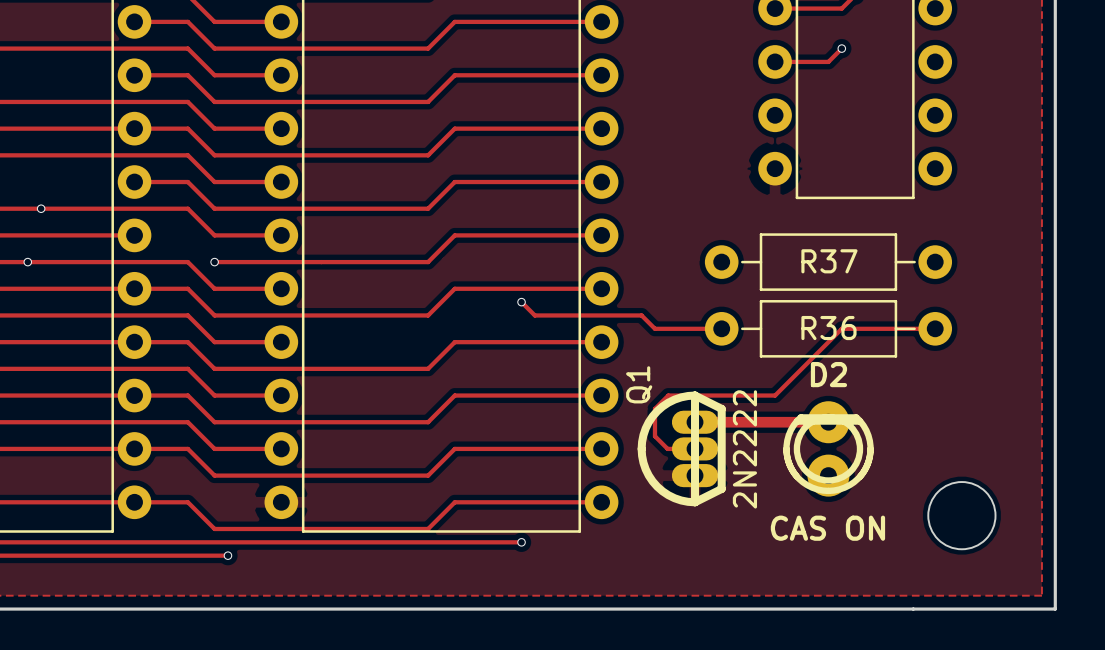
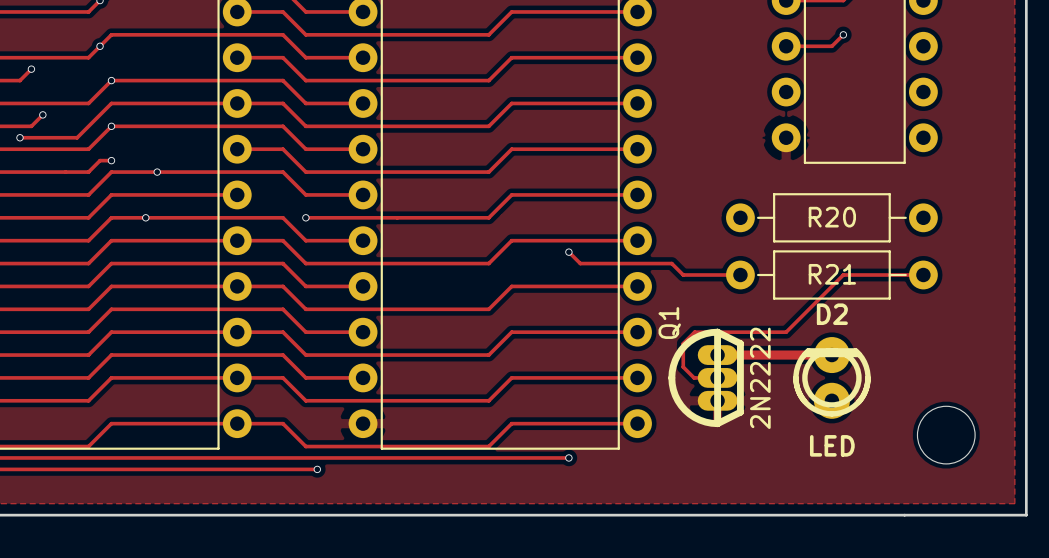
R37 name: R37 (829, 261) -> R20 (832, 217)
R36 name: R36 (828, 328) -> R21 (832, 274)
D2 value: CAS ON (827, 528) -> LED (832, 445)

